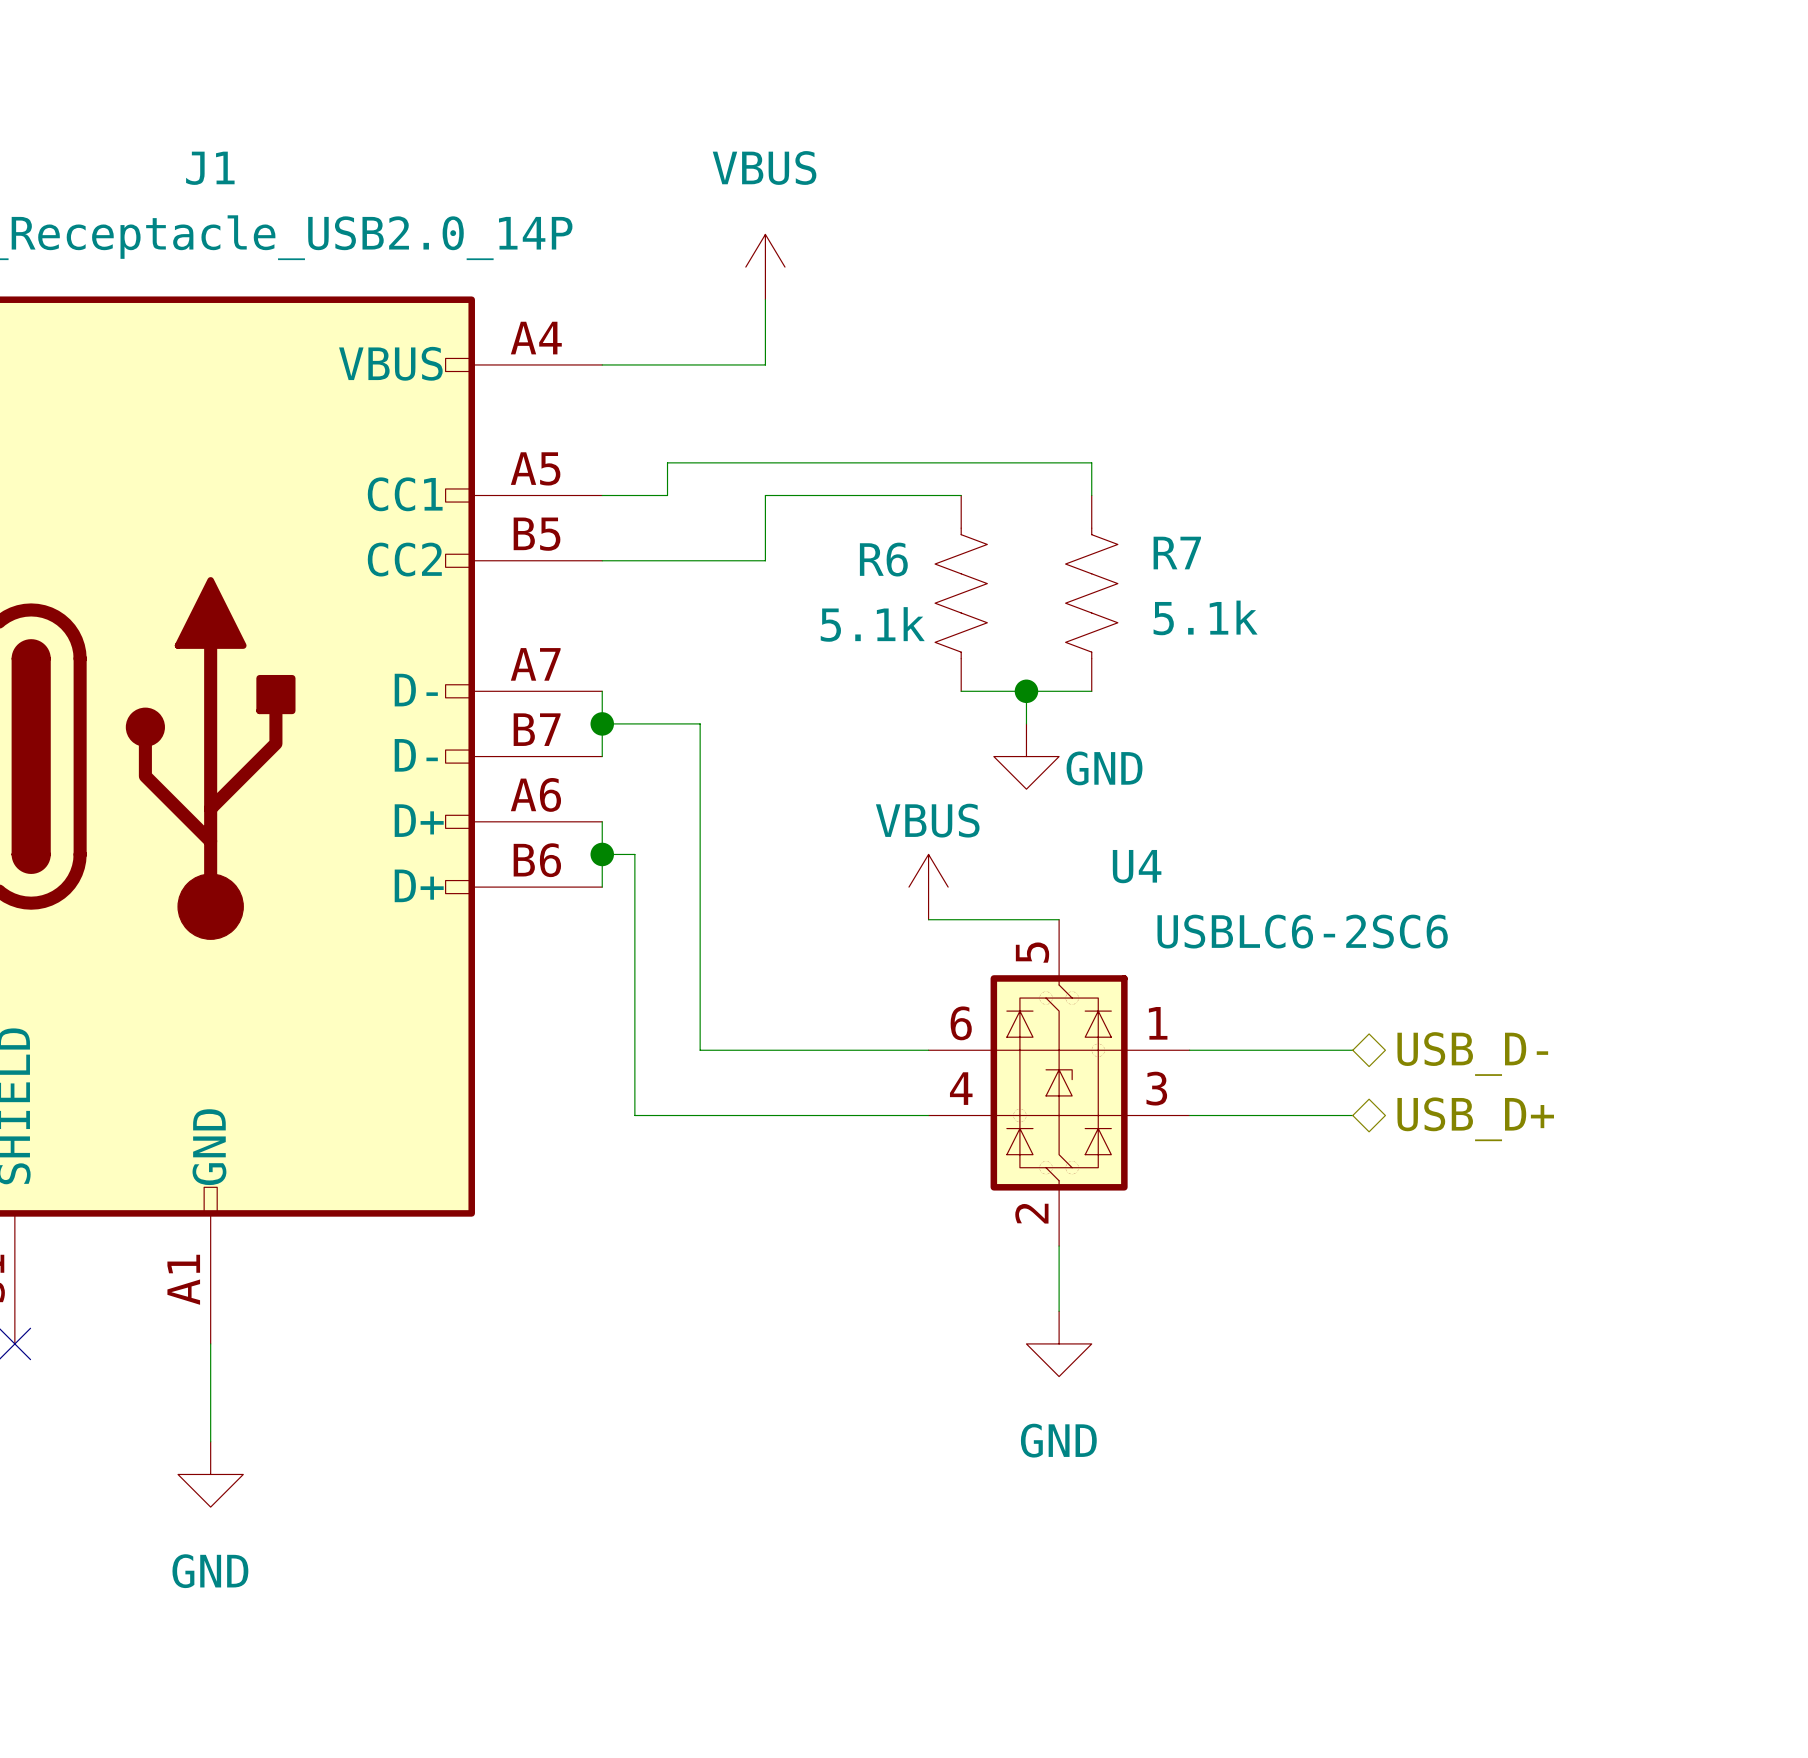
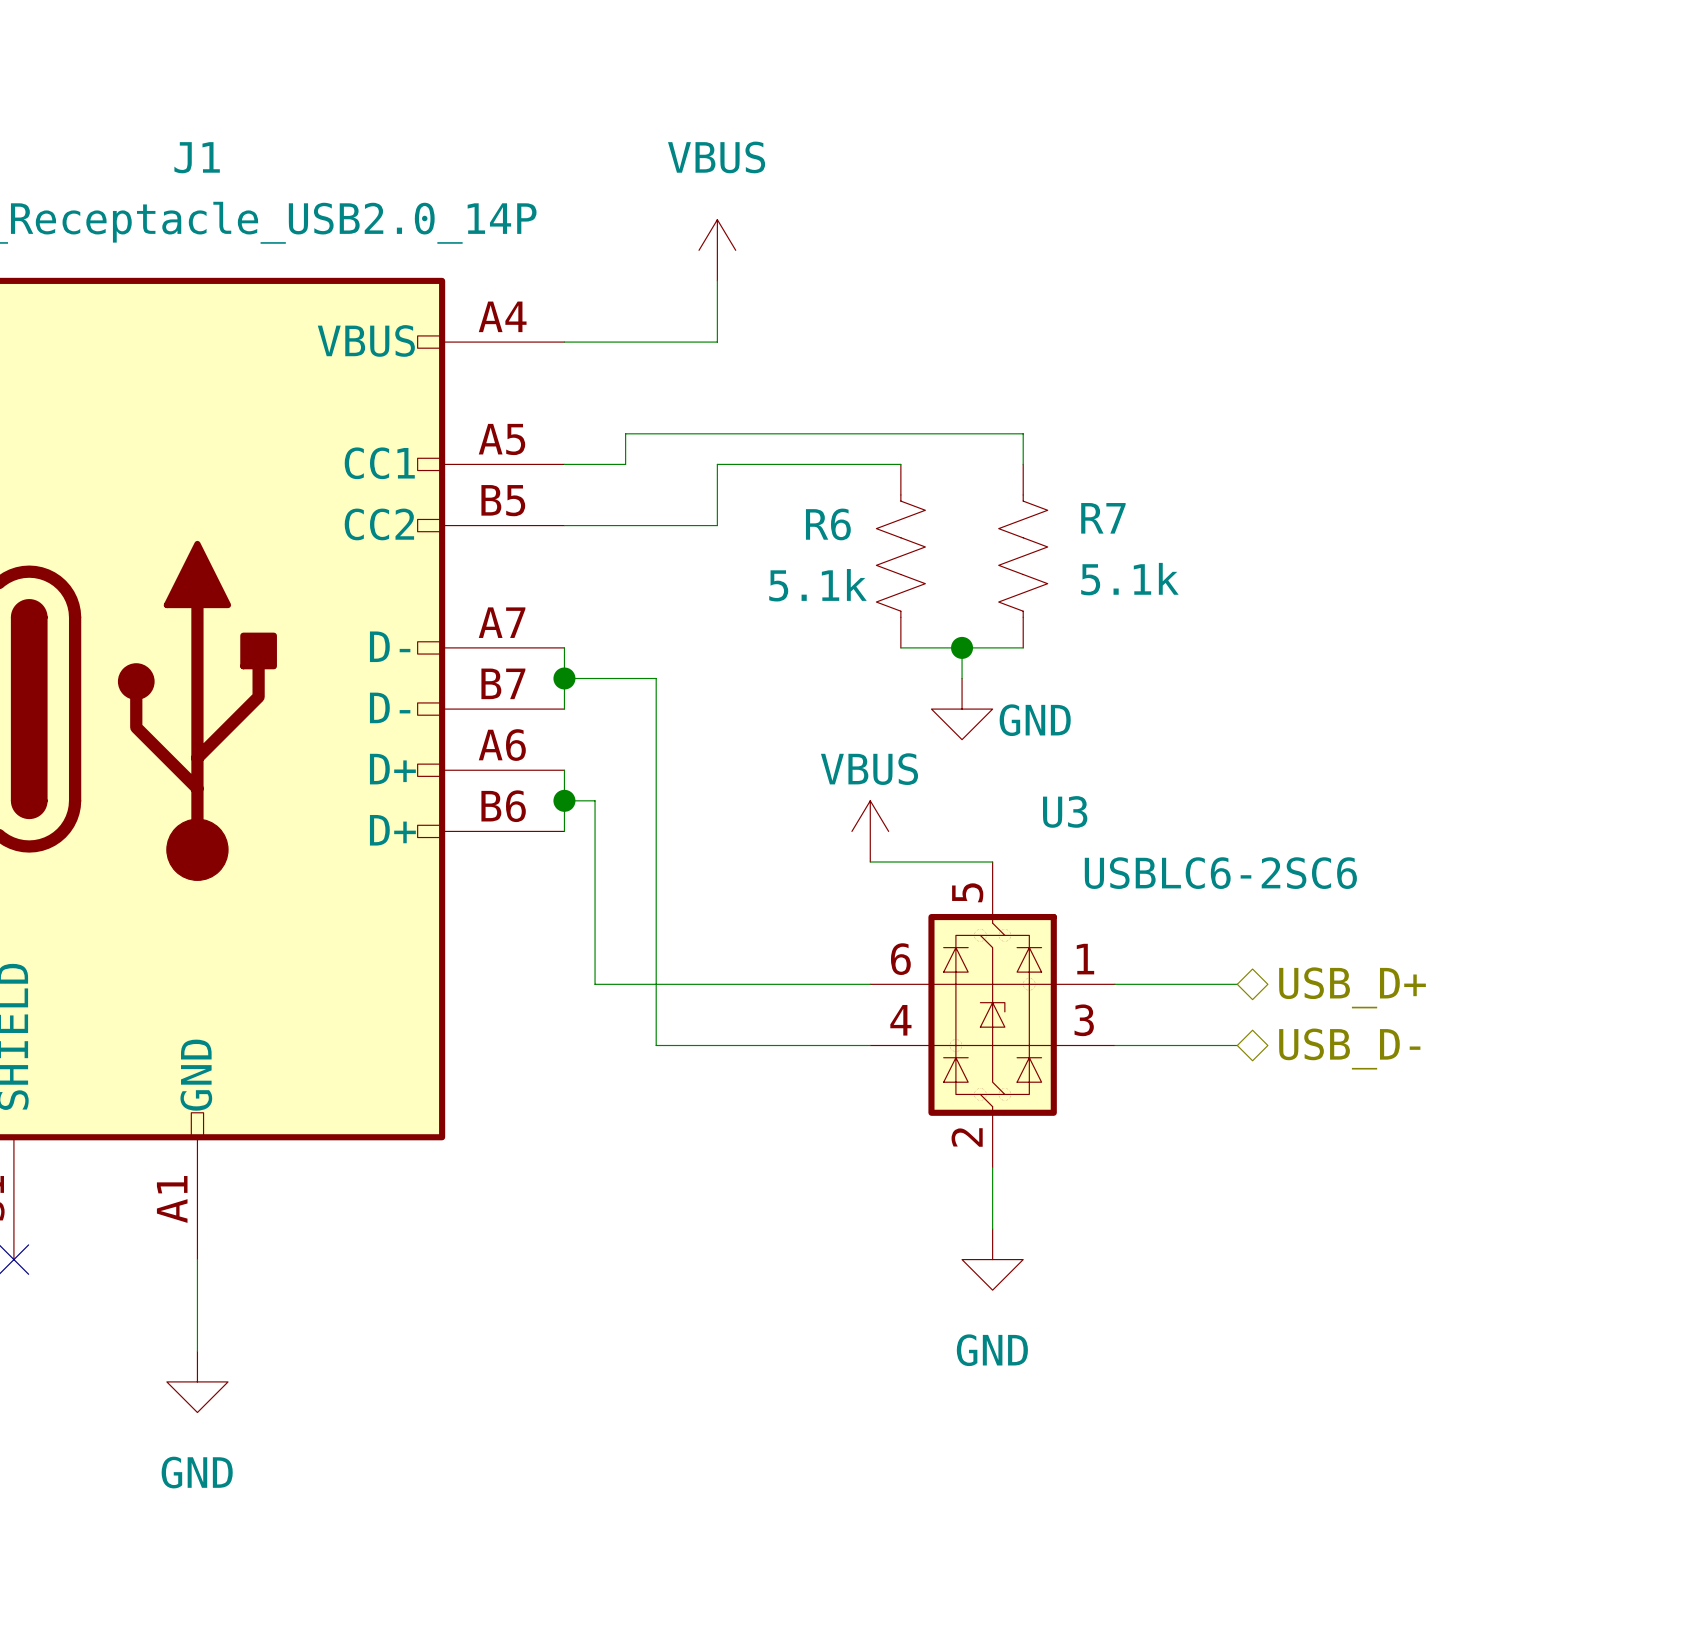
U4 name: U4 (1137, 866) -> U3 (1065, 811)
wire: (634, 1050) (634, 1115) (700, 1115) -> (595, 984) (656, 984) (656, 1045)
wire: (1320, 1050) (1352, 1050) -> none
hierarchical label position: USB_D- (1472, 1054) -> USB_D- (1349, 1049)
wire: (1320, 1115) (1352, 1115) -> none
hierarchical label position: USB_D+ (1475, 1119) -> USB_D+ (1352, 987)

